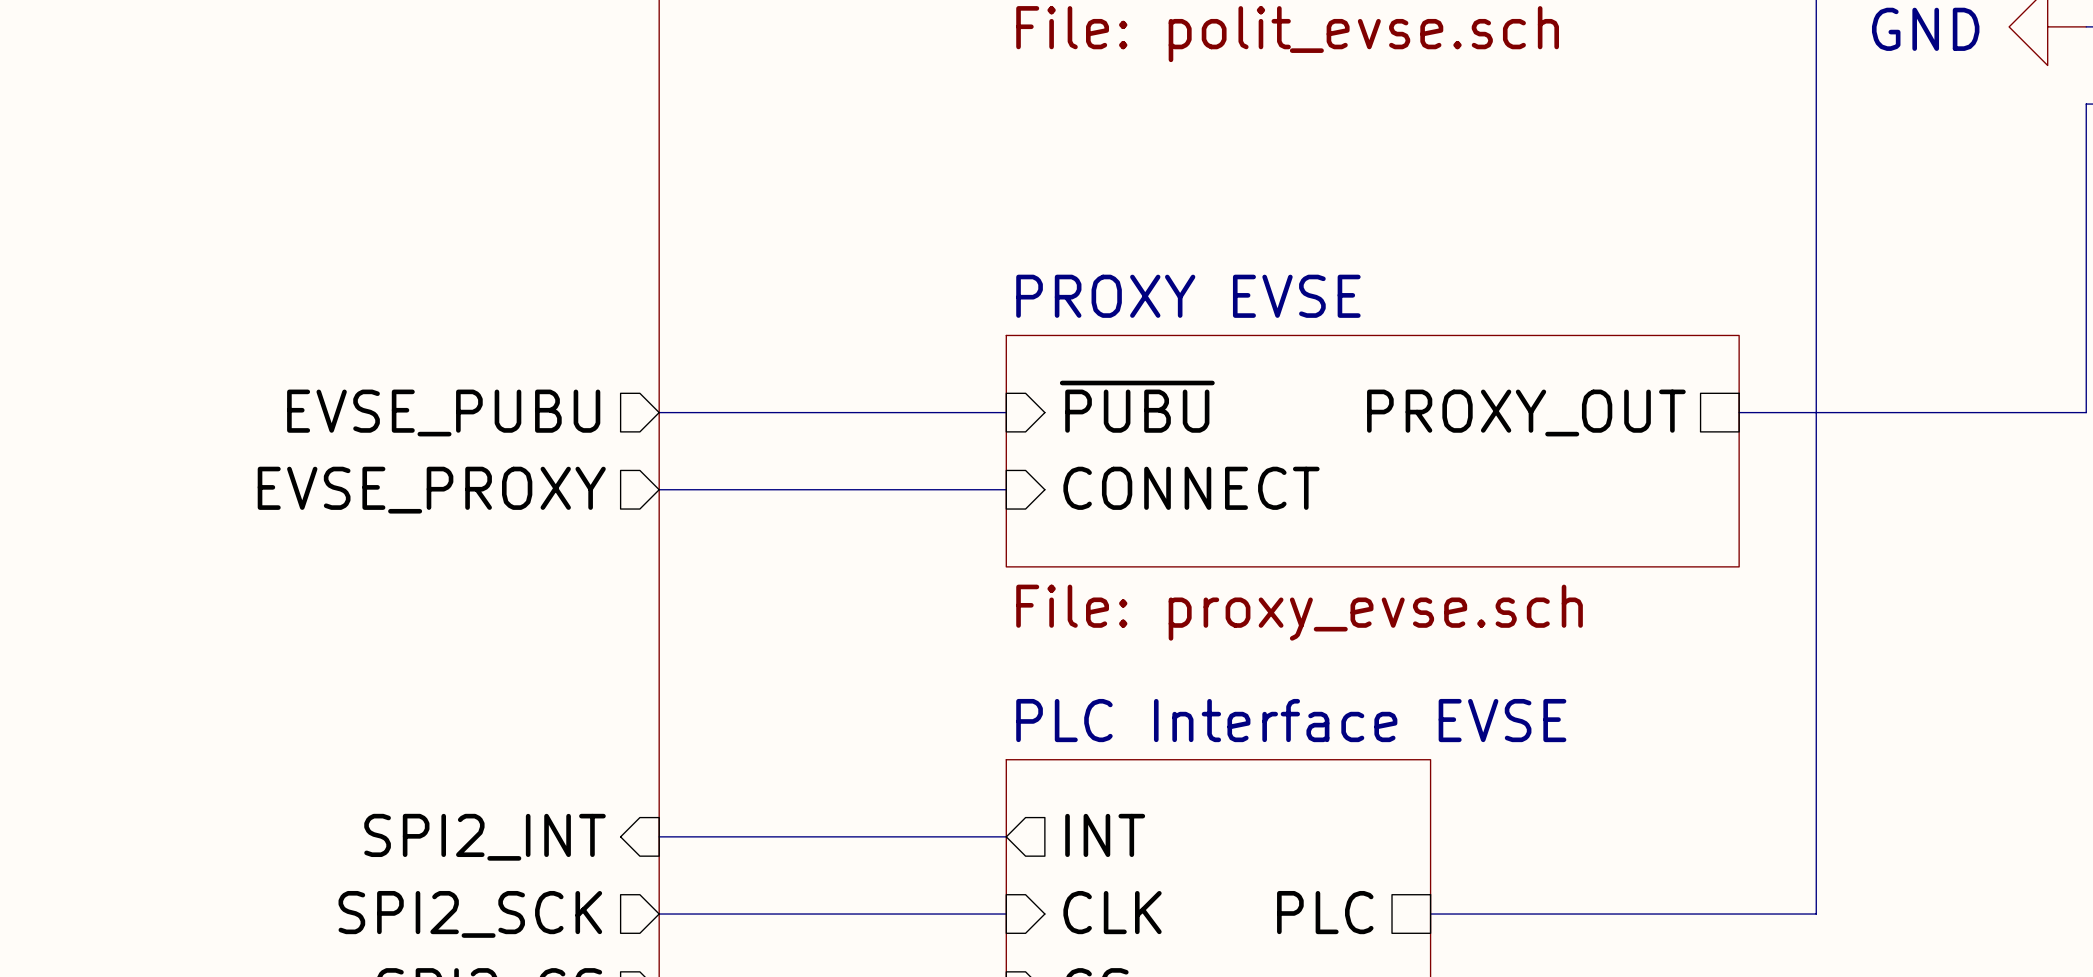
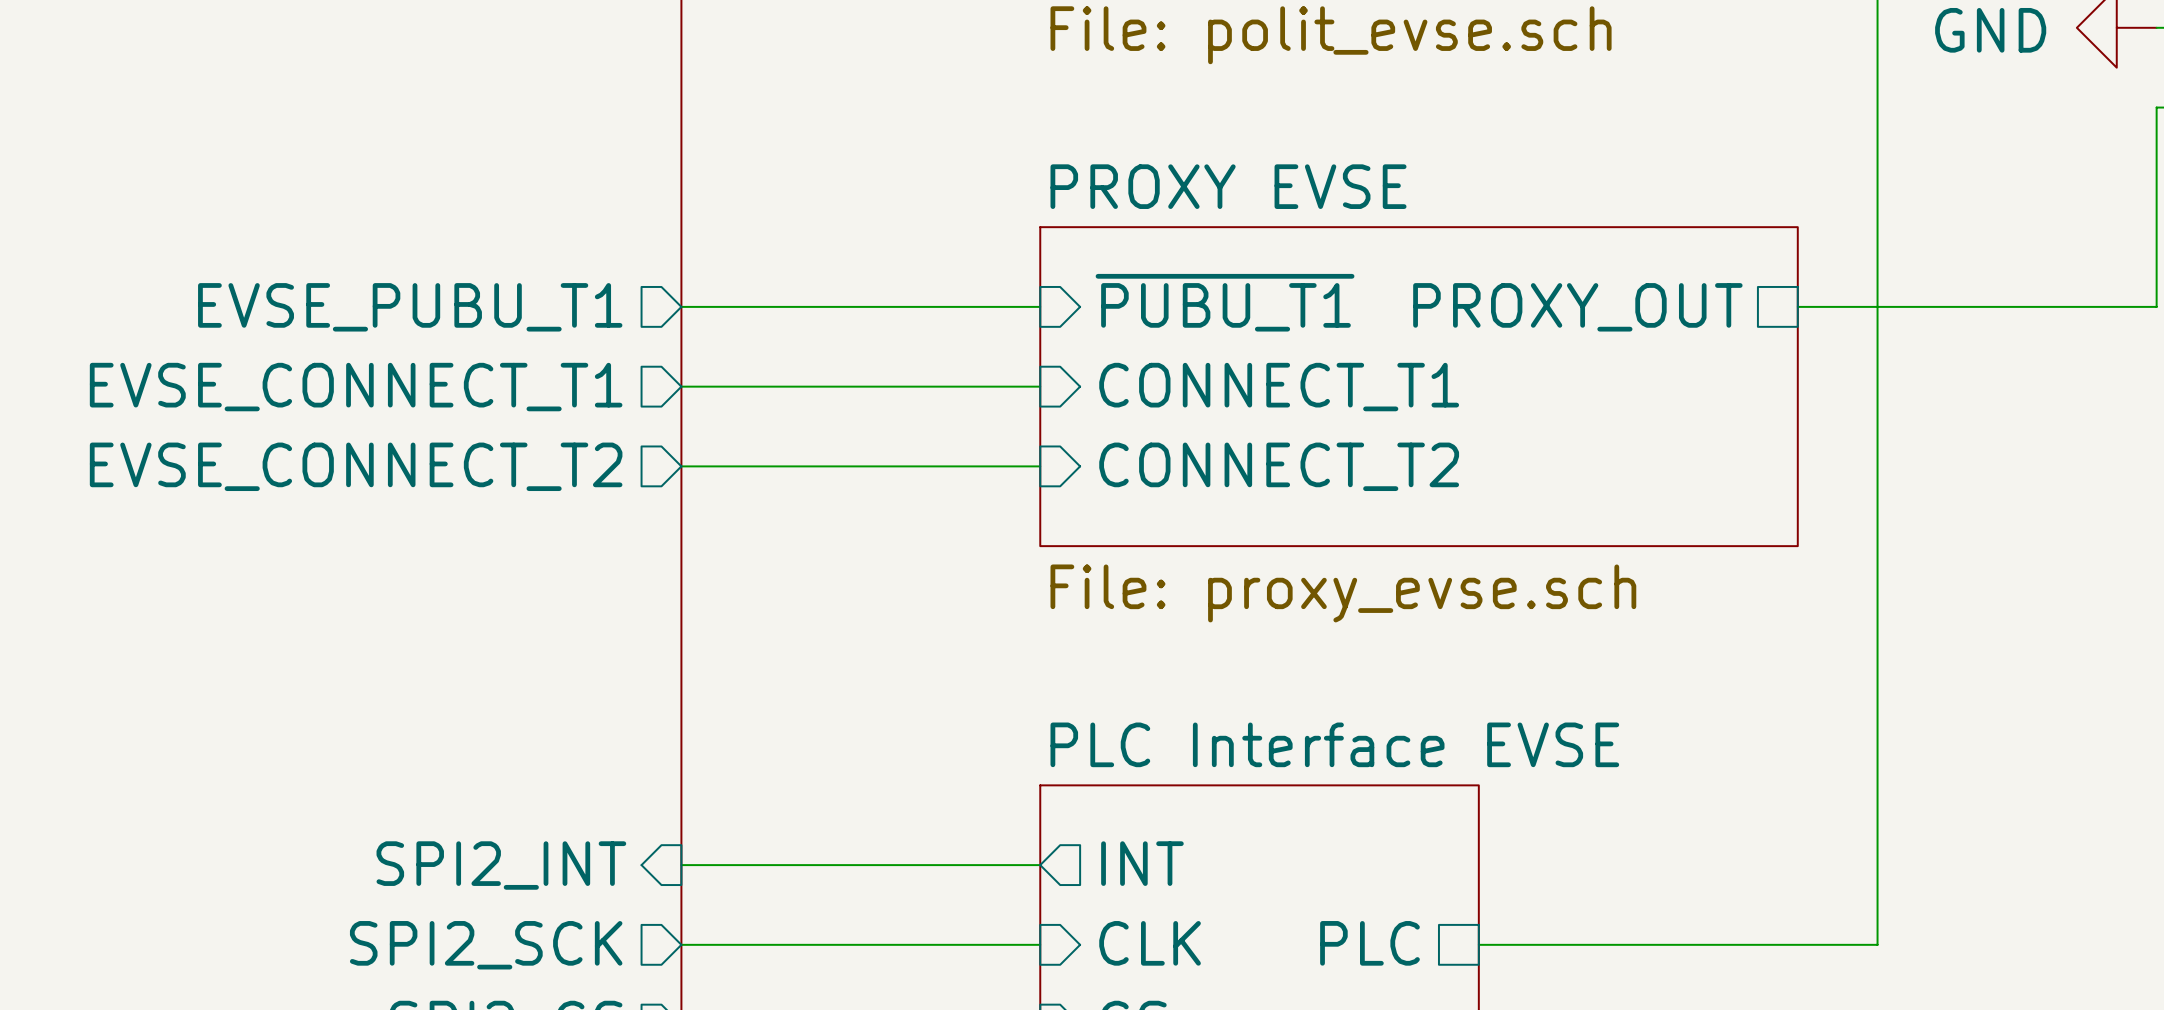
sheet pin: none -> ~{PUBU_T1} (1225, 302)
wire: none -> (681, 306) (1040, 306)
wire: (2086, 296) (2086, 412) (1739, 412) -> (2156, 306) (1797, 306)
sheet pin: none -> EVSE_PUBU_T1 (410, 307)
sheet pin: none -> EVSE_CONNECT_T1 (356, 387)
sheet pin: none -> CONNECT_T1 (1279, 387)
sheet PROXY EVSE: none -> File: proxy_evse.sch (1419, 386)
sheet pin: ~{PUBU} (1137, 406) -> none
sheet pin: EVSE_PUBU (443, 412) -> none
wire: (659, 412) (1006, 412) -> (681, 386) (1040, 386)
sheet pin position: PROXY_OUT (1526, 412) -> PROXY_OUT (1577, 307)
sheet pin: none -> EVSE_CONNECT_T2 (356, 466)
sheet PROXY EVSE: File: proxy_evse.sch (1372, 451) -> none
sheet pin: CONNECT (1191, 488) -> CONNECT_T2 (1279, 466)
wire: (659, 489) (1006, 489) -> (681, 466) (1040, 466)
sheet pin: EVSE_PROXY (431, 490) -> none

